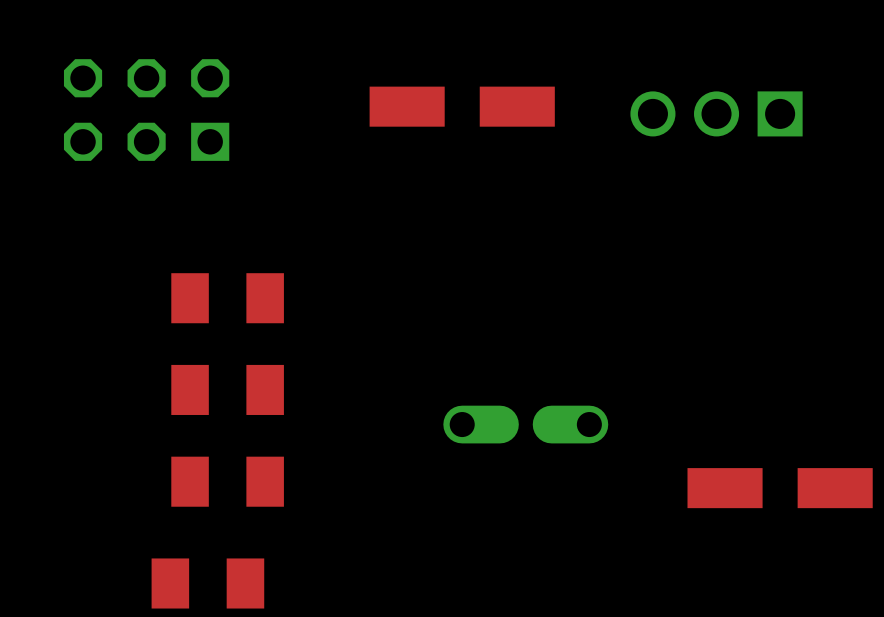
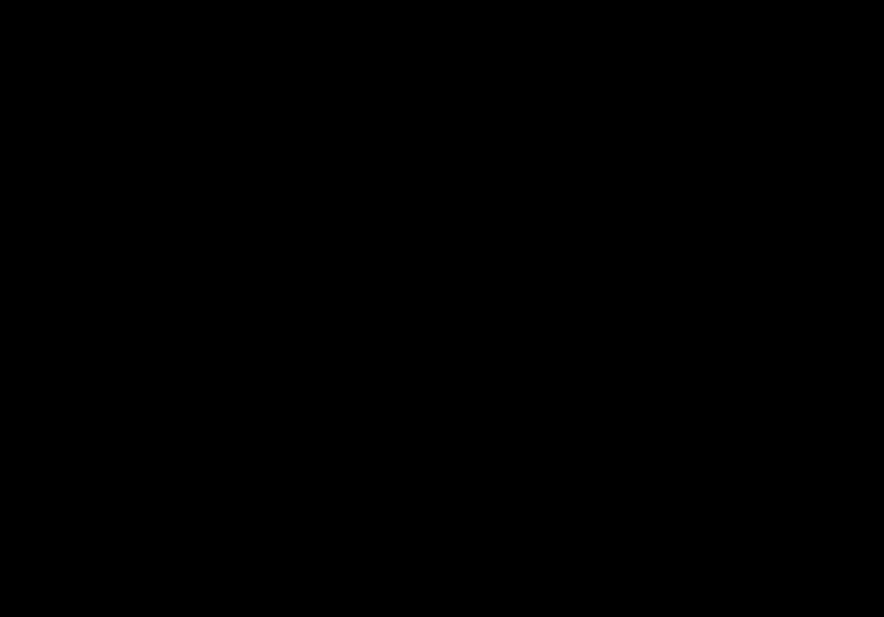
part: (462, 106) -> none
part: (146, 110) -> none
part: (716, 113) -> none
part: (227, 298) -> none
part: (227, 389) -> none
part: (525, 424) -> none
part: (227, 481) -> none
part: (780, 488) -> none
part: (207, 583) -> none

